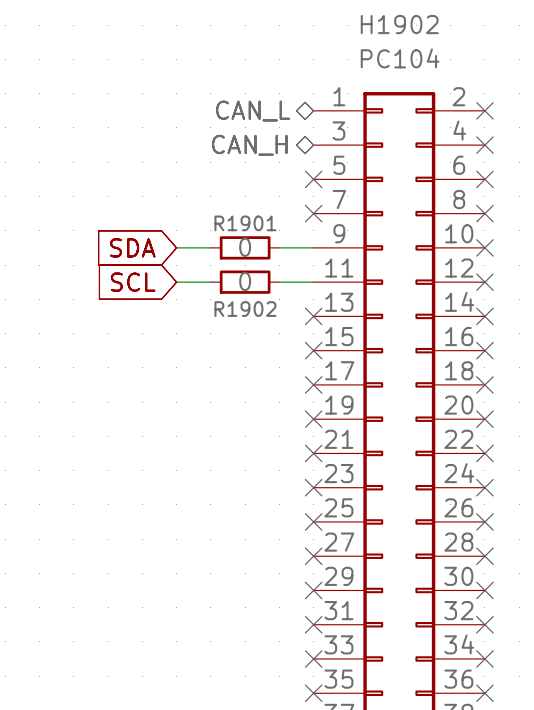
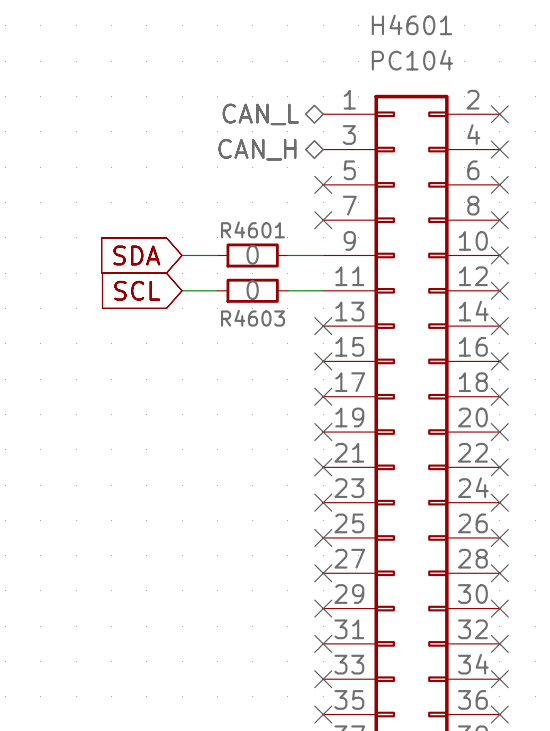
H1902 name: H1902 (399, 24) -> H4601 (411, 24)
R1901 name: R1901 (245, 223) -> R4601 (252, 229)
R1902 name: R1902 (245, 309) -> R4603 (252, 318)

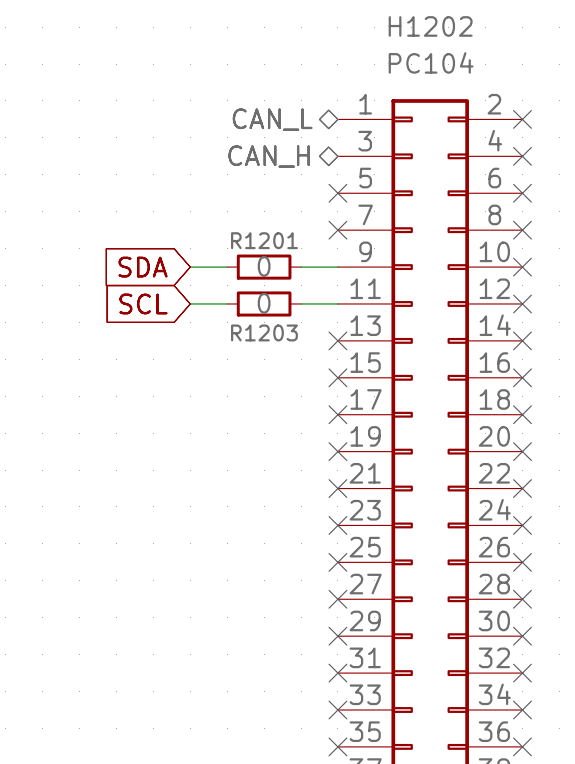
H4601 name: H4601 (411, 24) -> H1202 (430, 26)
R4601 name: R4601 (252, 229) -> R1201 (264, 240)
R4603 name: R4603 (252, 318) -> R1203 (264, 332)

